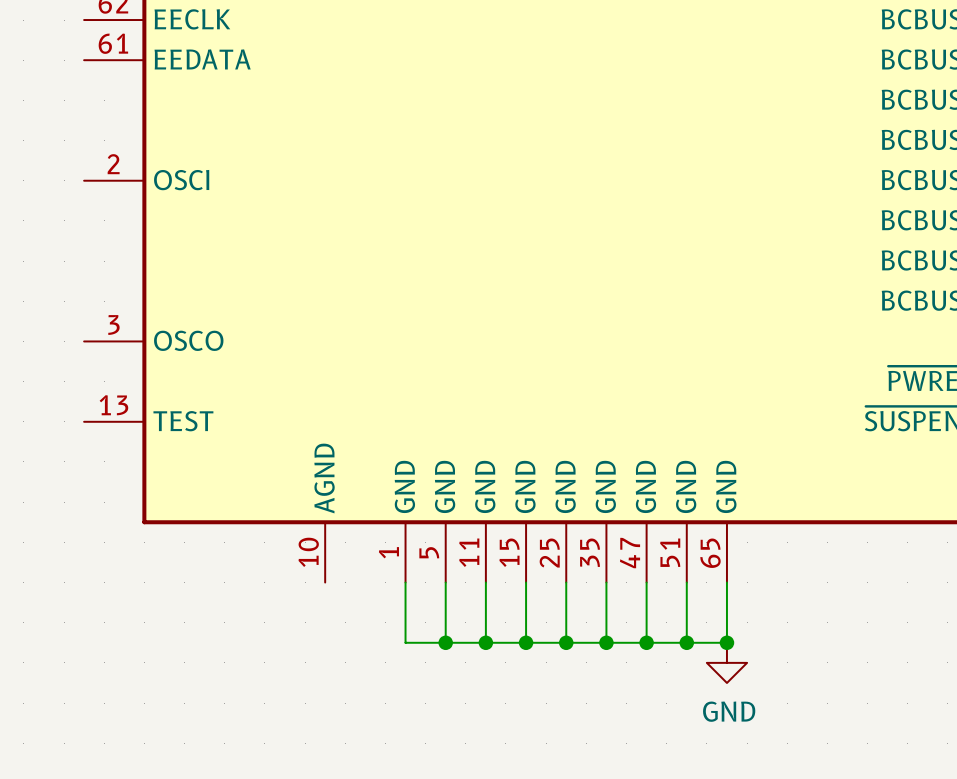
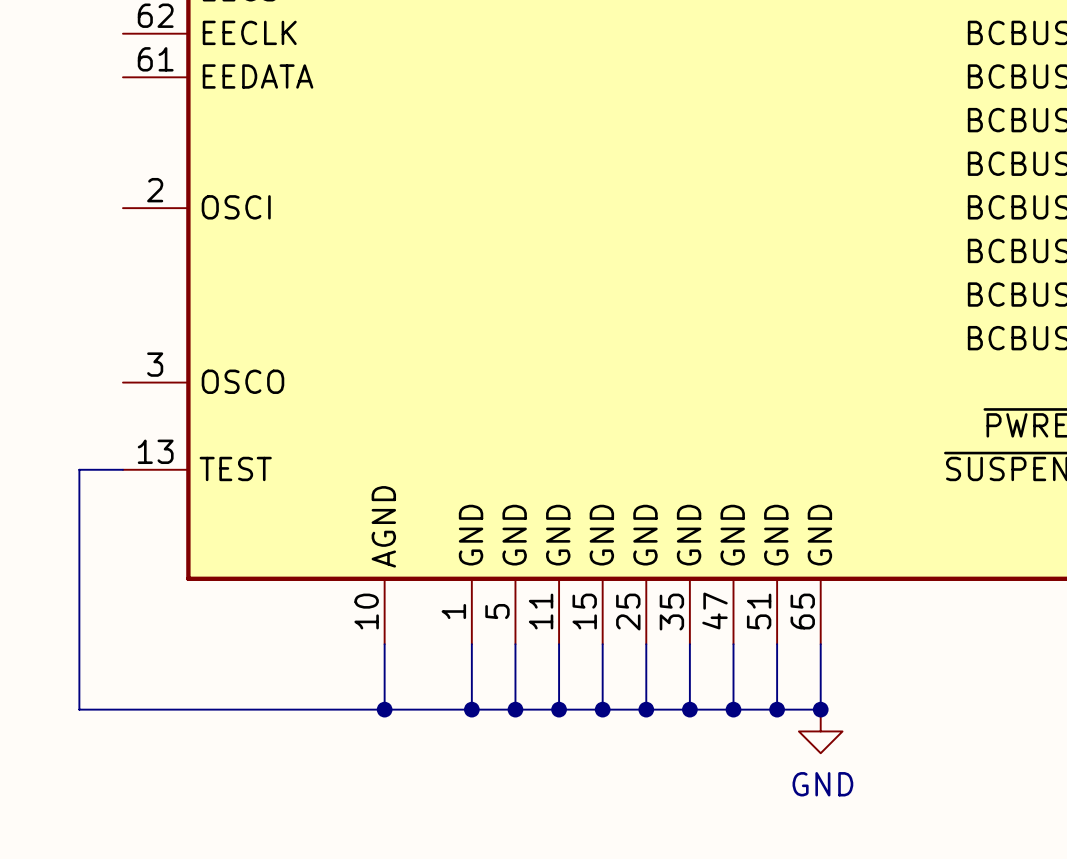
wire: none -> (122, 469) (79, 469) (79, 709) (471, 709)
wire: none -> (384, 644) (384, 709)
junction: none -> (384, 709)
junction: none -> (471, 709)

